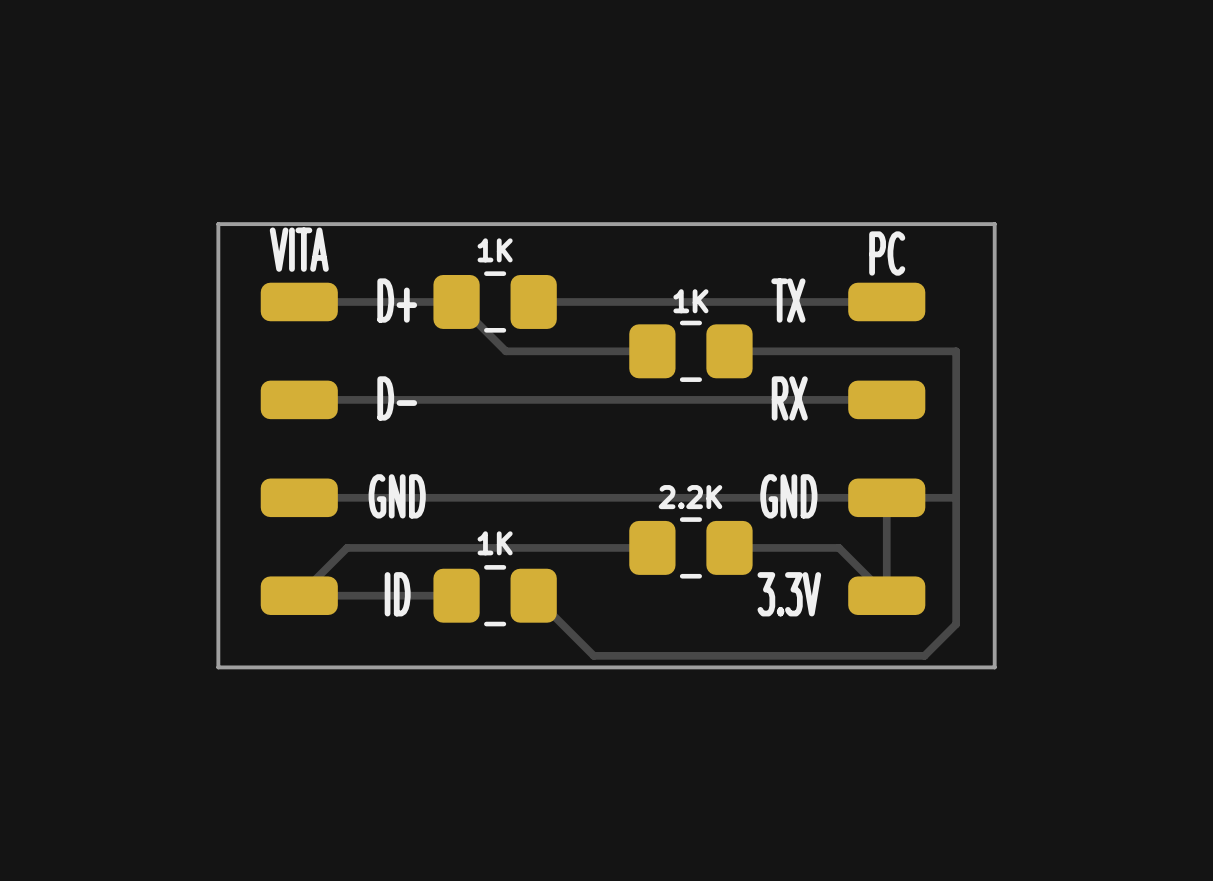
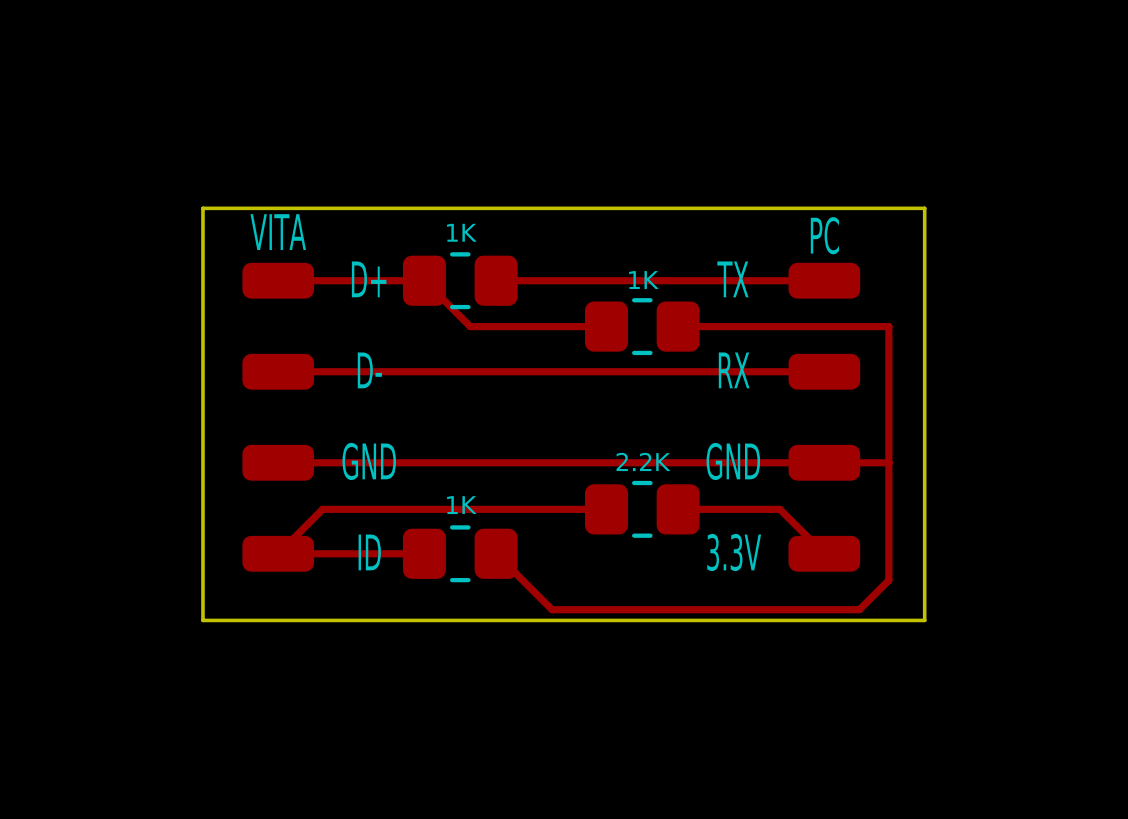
track: (886, 497) (886, 595) -> none

